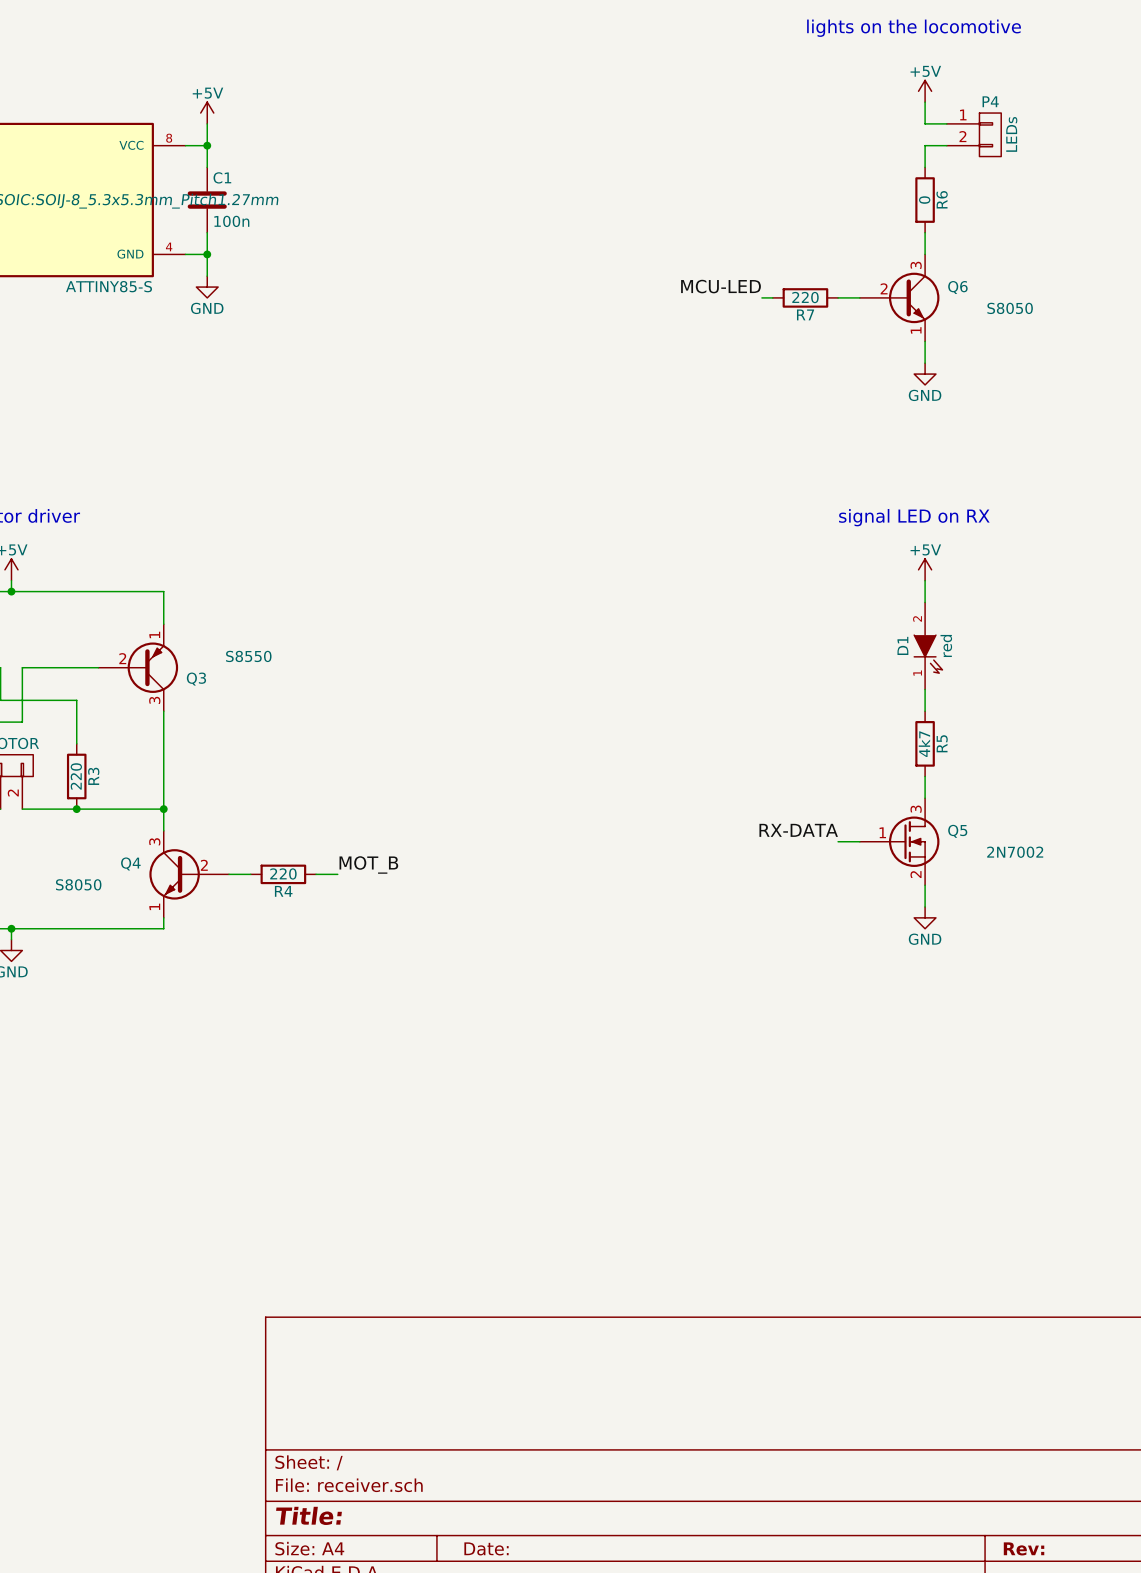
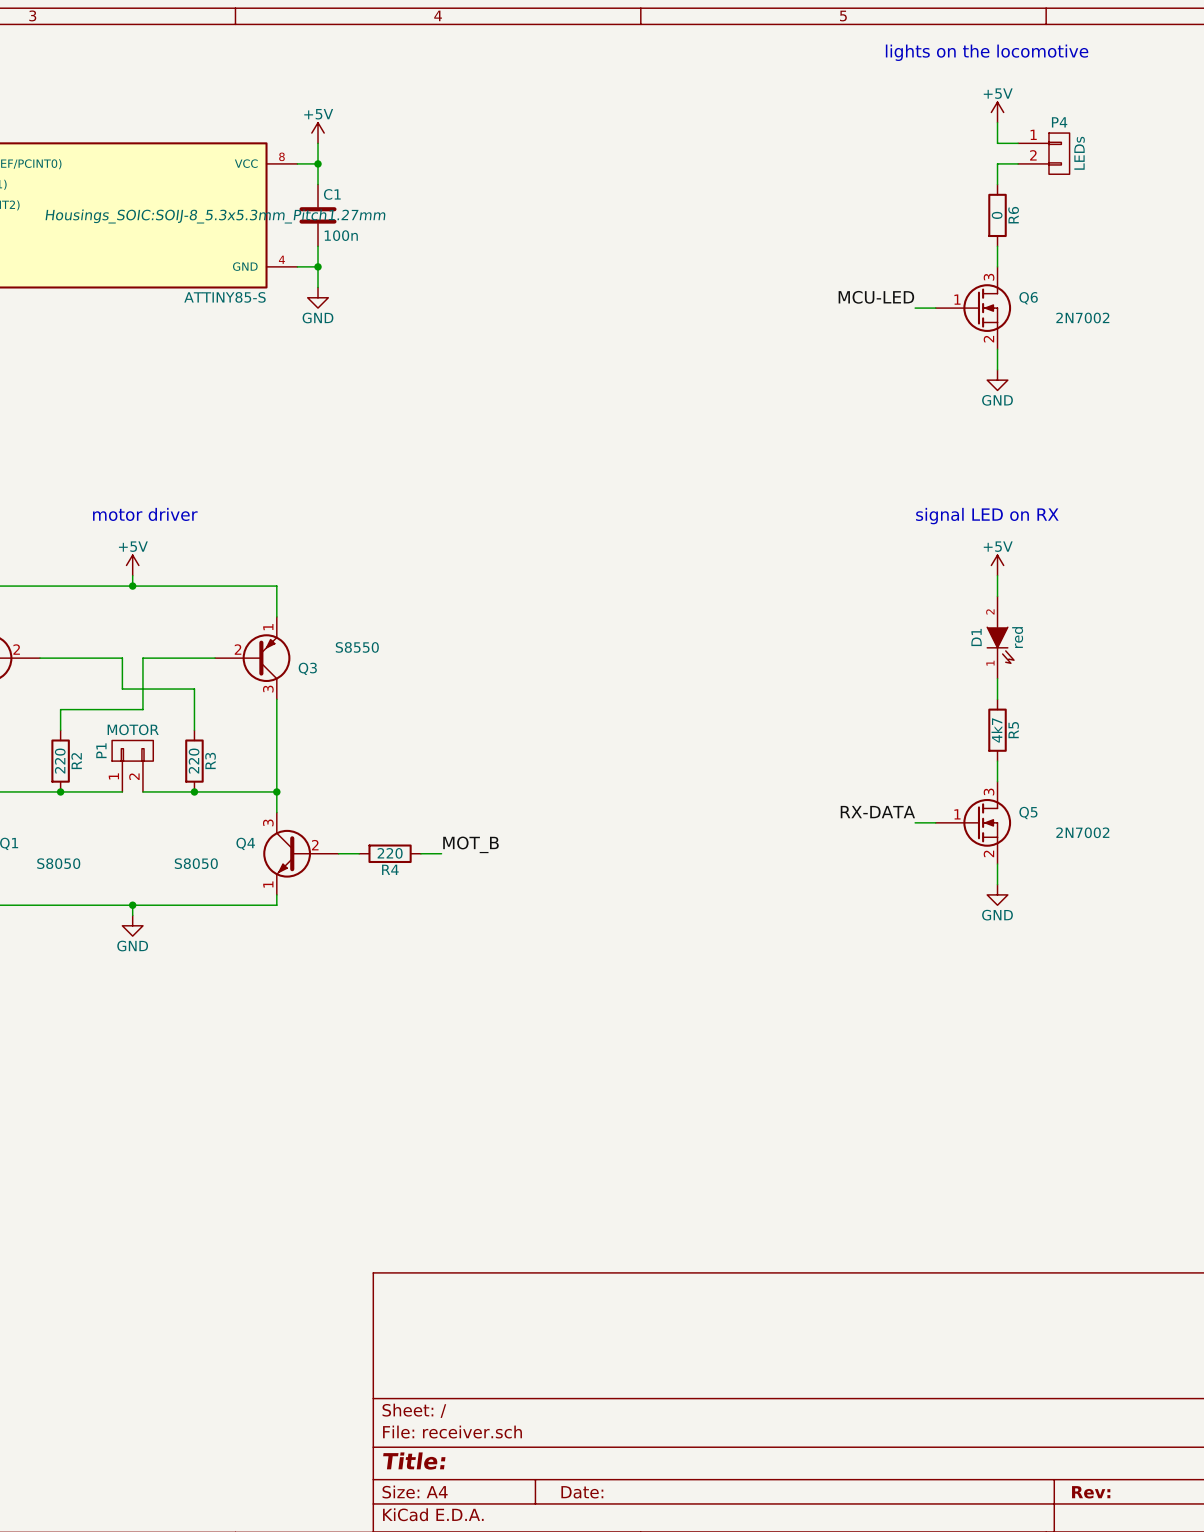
Q6 symbol: [859, 254, 940, 342] -> [935, 266, 1012, 350]
label position: MCU-LED (721, 286) -> MCU-LED (876, 297)
wire: (761, 297) (772, 297) -> none
R7: 220 (805, 297) -> none
Q6 value: S8050 (1010, 308) -> 2N7002 (1082, 317)

